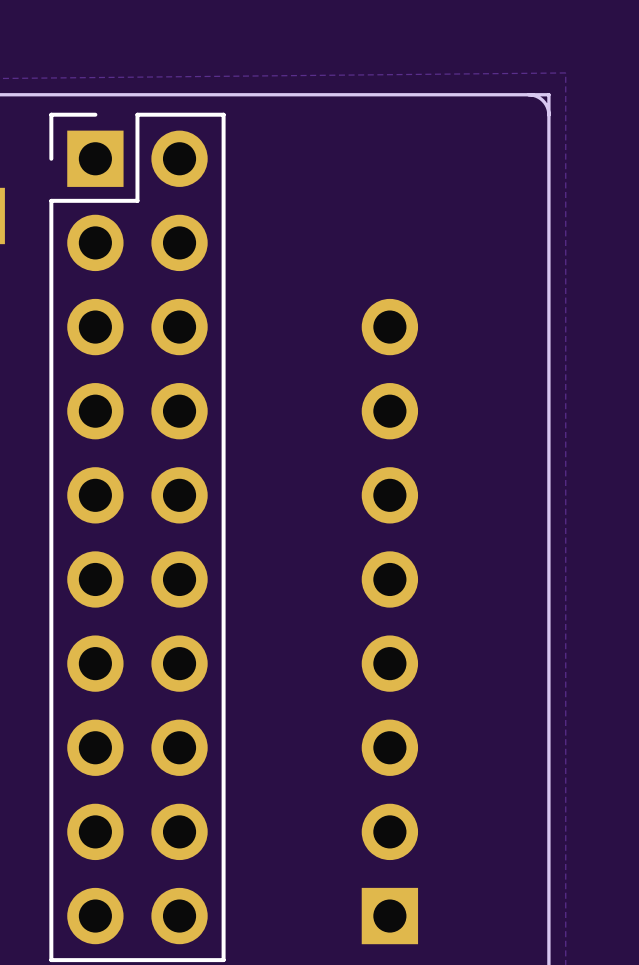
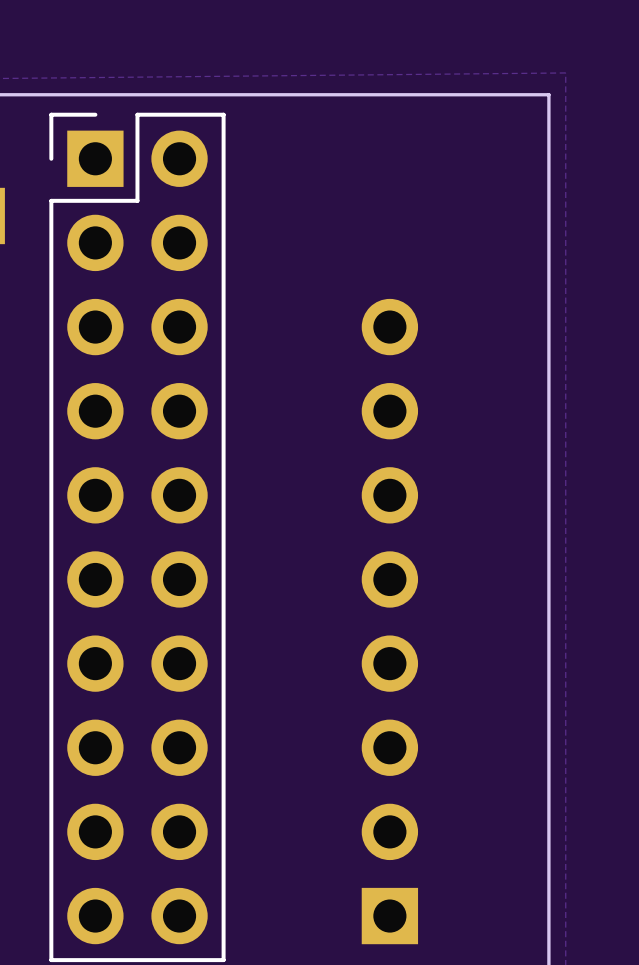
board edge: (528, 94) (536, 96) (542, 100) (547, 107) (548, 115) -> none

